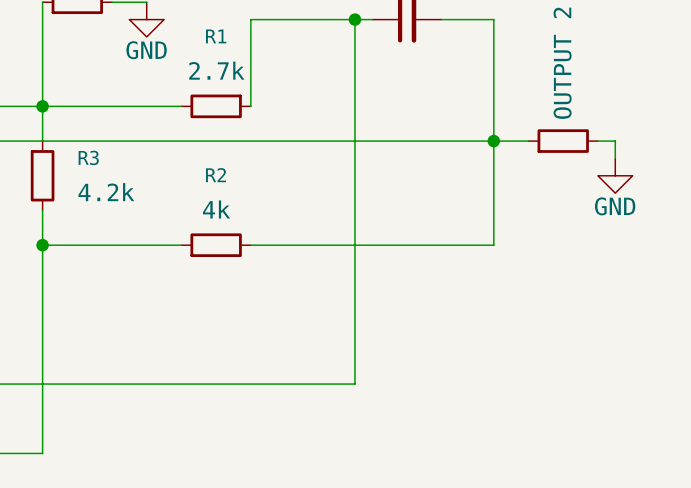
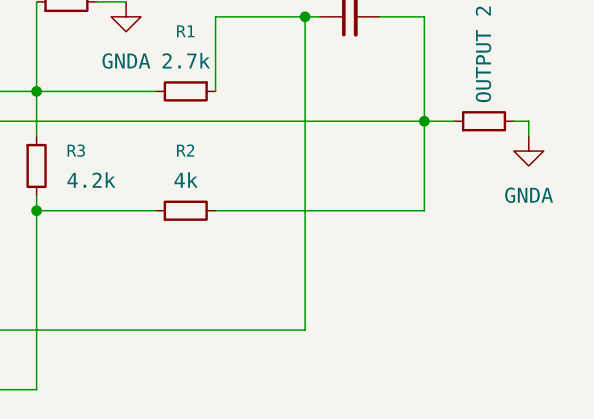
power symbol: GND (146, 19) -> GNDA (126, 16)
R3 position: (42, 175) -> (36, 165)
power symbol: GND (615, 175) -> GNDA (528, 151)

